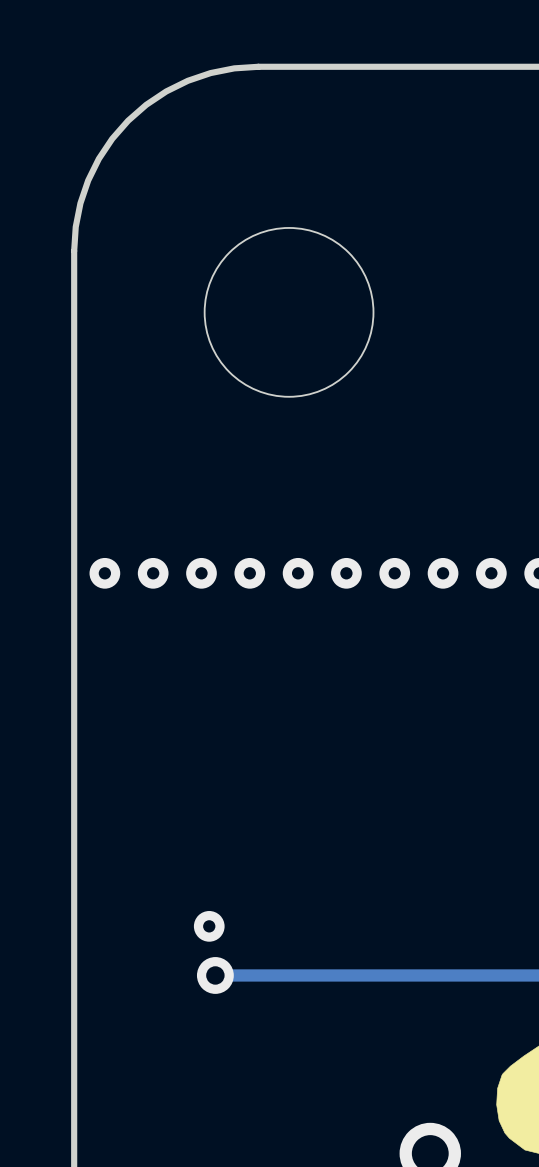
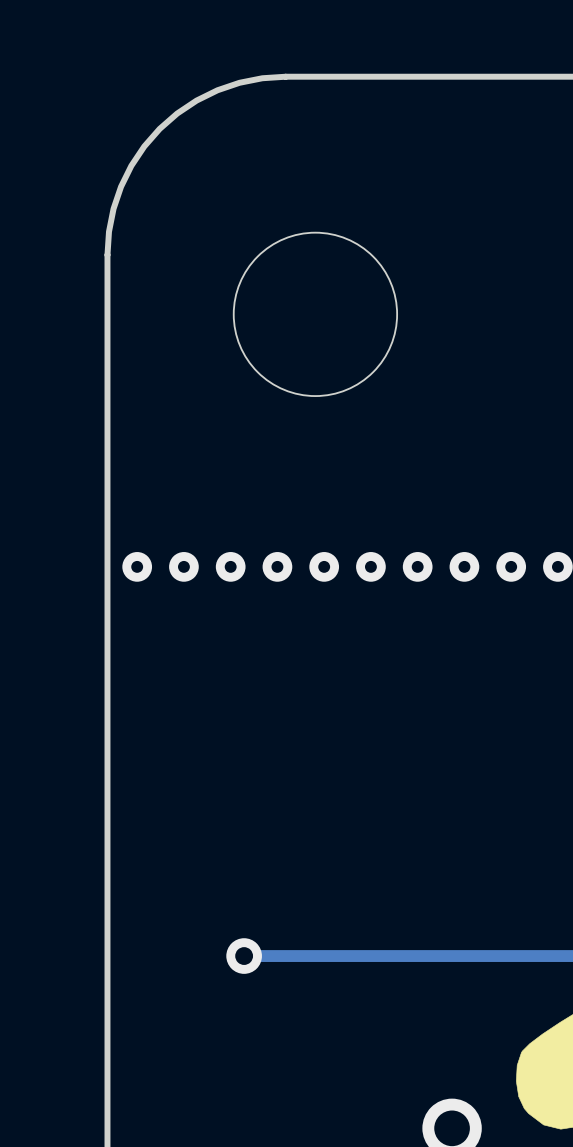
via: (209, 926) -> none

